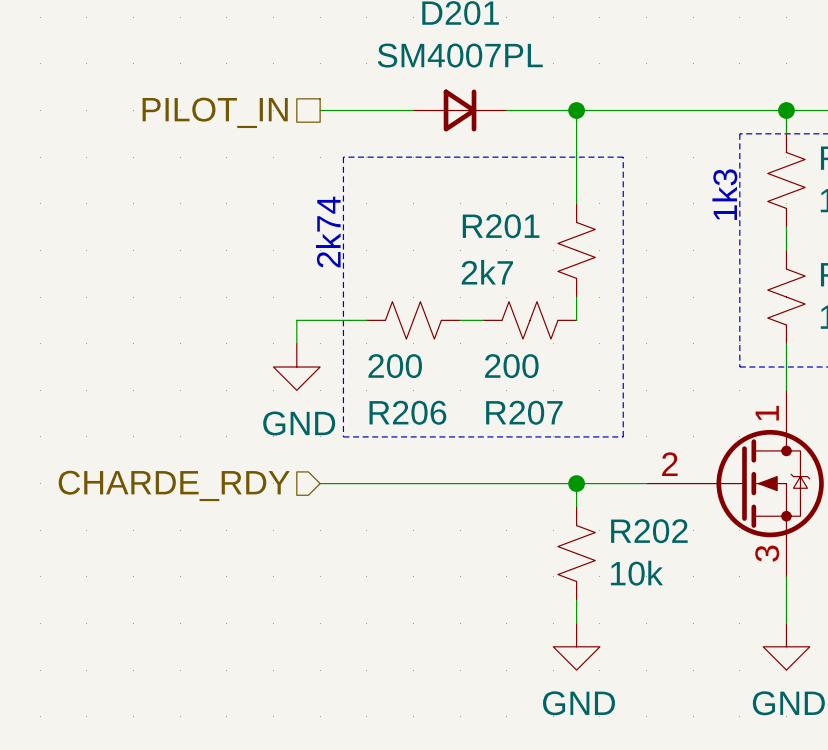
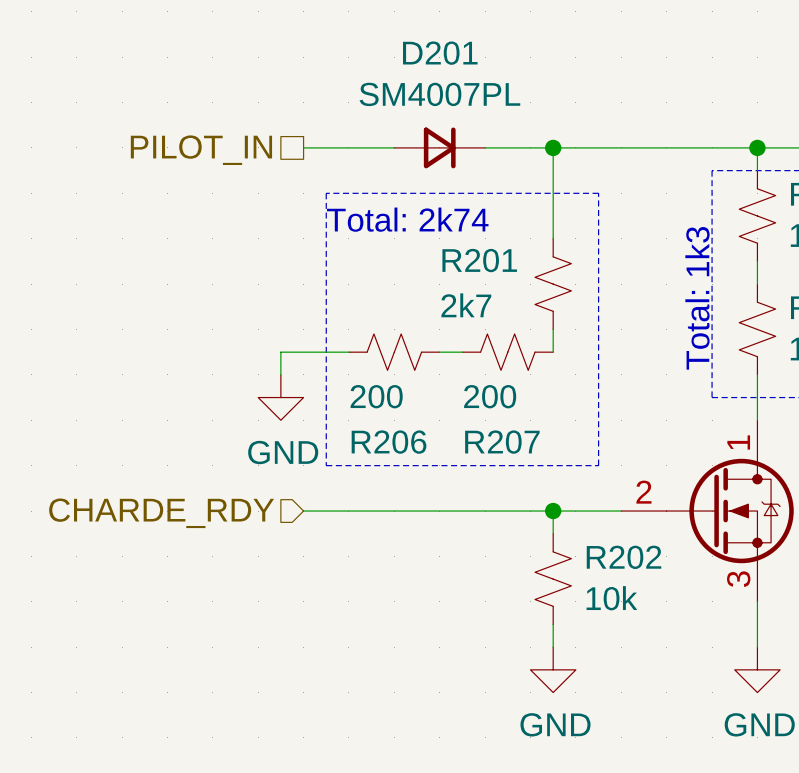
text: none -> Total: 2k74 (407, 219)
text: 1k3 (724, 194) -> none
text: 2k74 (328, 232) -> none
text: none -> Total: 1k3 (697, 298)

